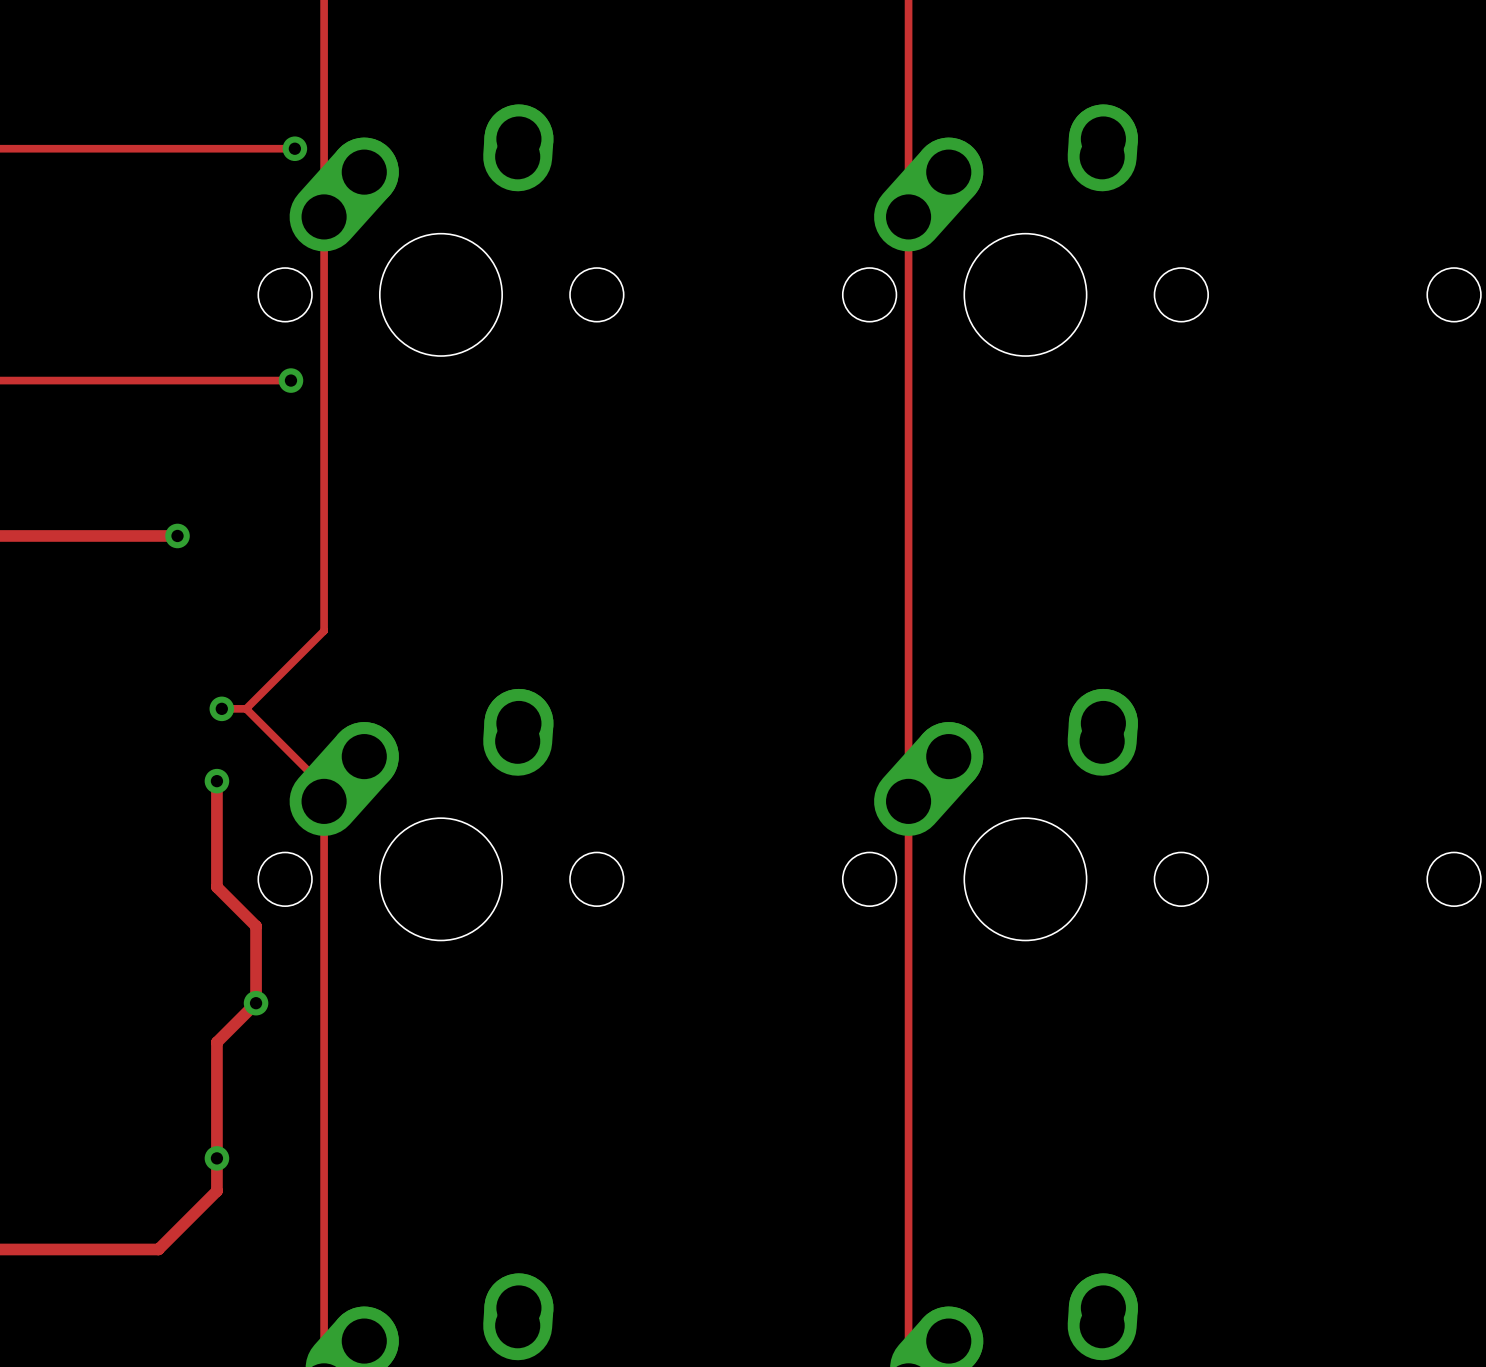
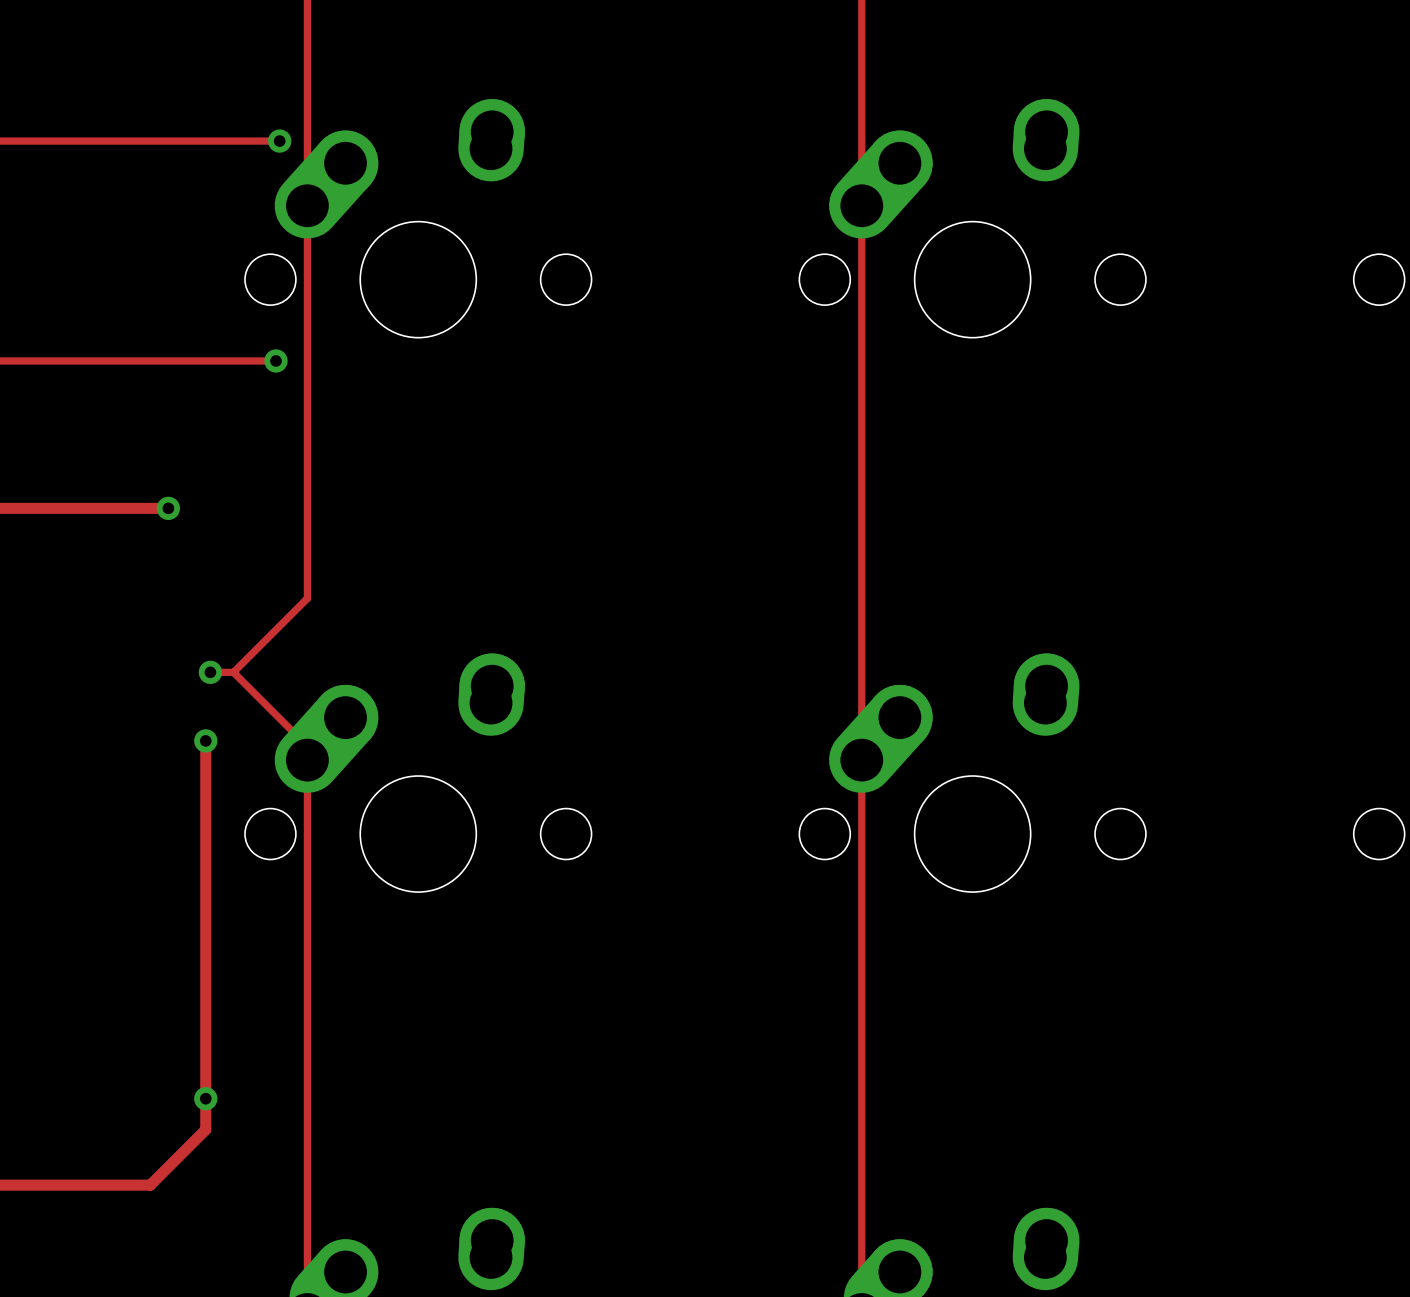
track: (216, 887) (256, 926) (256, 1003) (216, 1042) -> (205, 841) (205, 988)
via: (256, 1003) -> none

